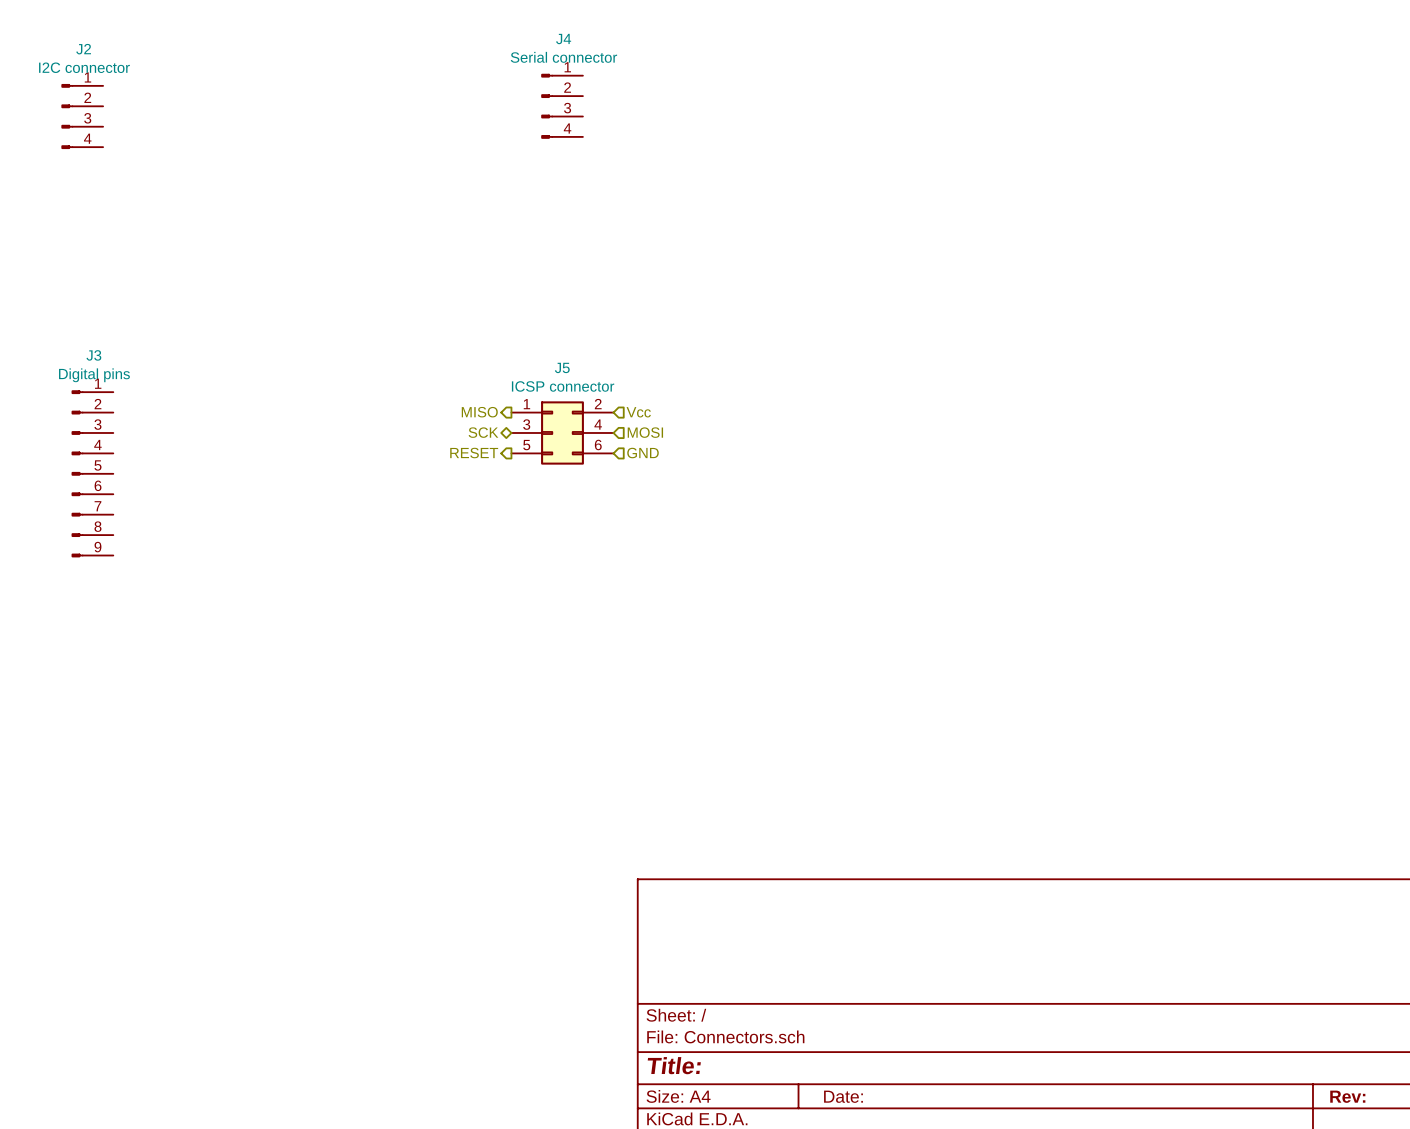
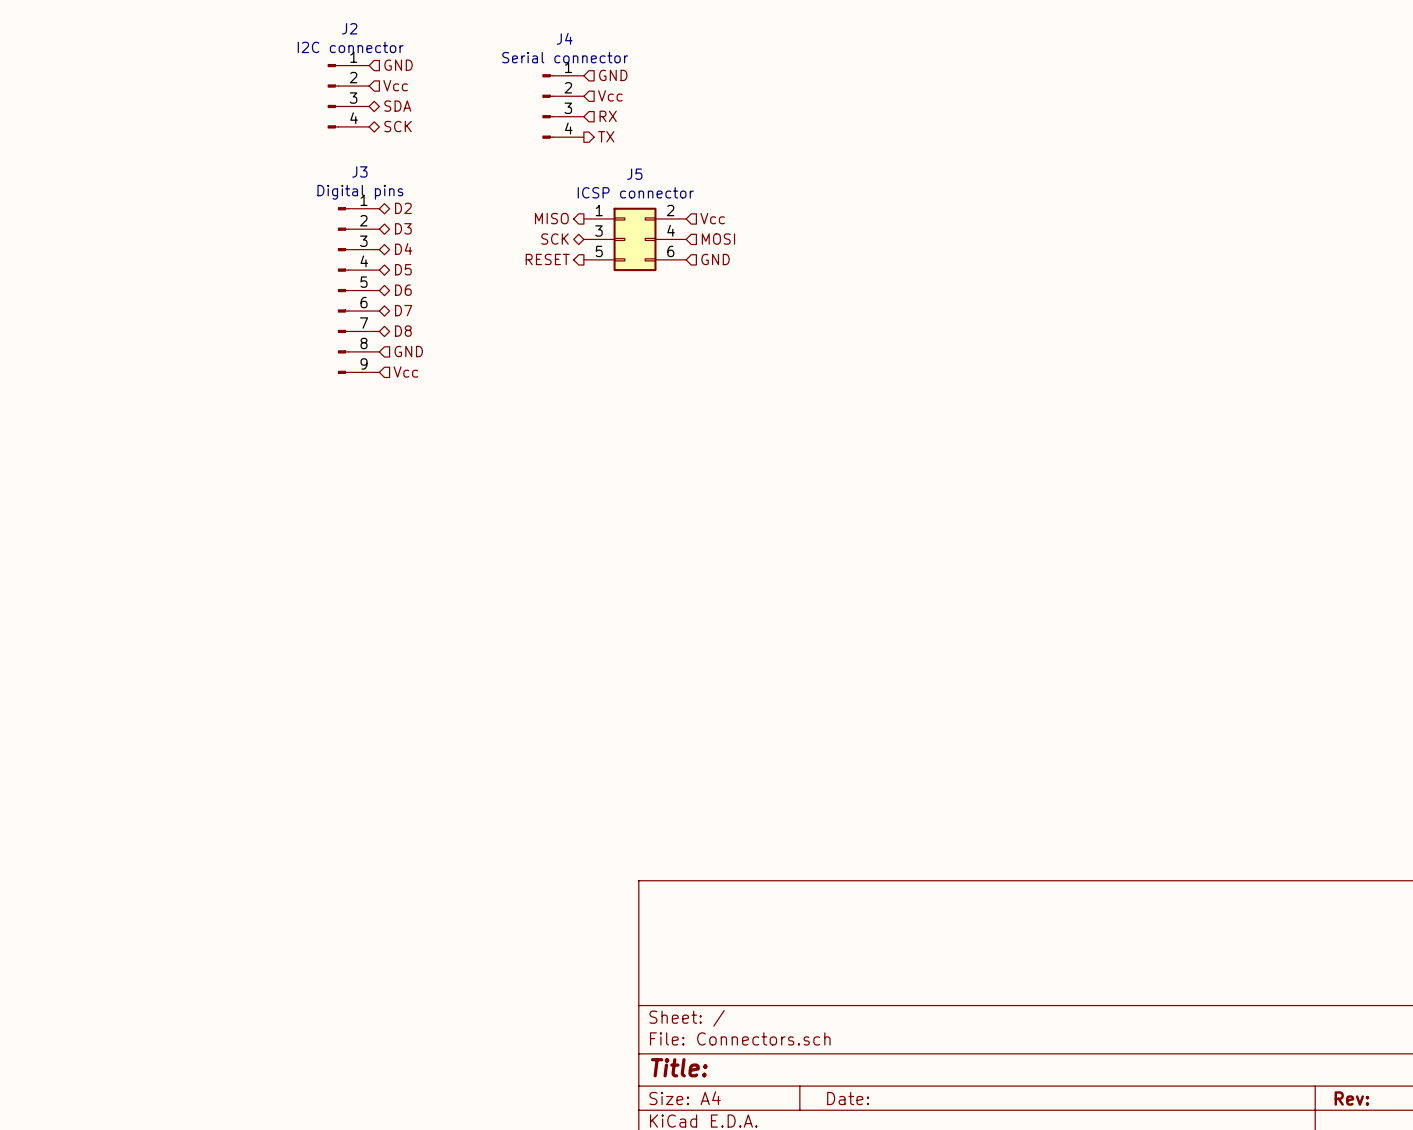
hierarchical label: none -> GND (398, 65)
hierarchical label: none -> GND (613, 75)
hierarchical label: none -> Vcc (395, 85)
hierarchical label: none -> Vcc (610, 95)
hierarchical label: none -> SDA (397, 106)
J2 position: (82, 116) -> (348, 96)
hierarchical label: none -> RX (608, 116)
hierarchical label: none -> SCK (398, 126)
hierarchical label: none -> TX (606, 136)
hierarchical label: none -> D2 (403, 208)
hierarchical label: none -> MISO (551, 218)
hierarchical label: none -> Vcc (712, 218)
hierarchical label: none -> D3 (403, 228)
hierarchical label: none -> SCK (555, 239)
hierarchical label: none -> MOSI (718, 239)
hierarchical label: none -> D4 (403, 249)
hierarchical label: none -> RESET (547, 259)
hierarchical label: none -> GND (715, 259)
hierarchical label: none -> D5 (403, 269)
hierarchical label: none -> D6 (403, 290)
hierarchical label: none -> D7 (403, 310)
hierarchical label: none -> D8 (403, 331)
hierarchical label: none -> GND (408, 351)
hierarchical label: none -> Vcc (405, 371)
hierarchical label: MISO (479, 412) -> none
hierarchical label: Vcc (638, 412) -> none
hierarchical label: SCK (483, 432) -> none
J5 position: (562, 432) -> (635, 239)
hierarchical label: MOSI (645, 432) -> none
hierarchical label: RESET (474, 453) -> none
hierarchical label: GND (643, 453) -> none
J3 position: (92, 473) -> (358, 290)

